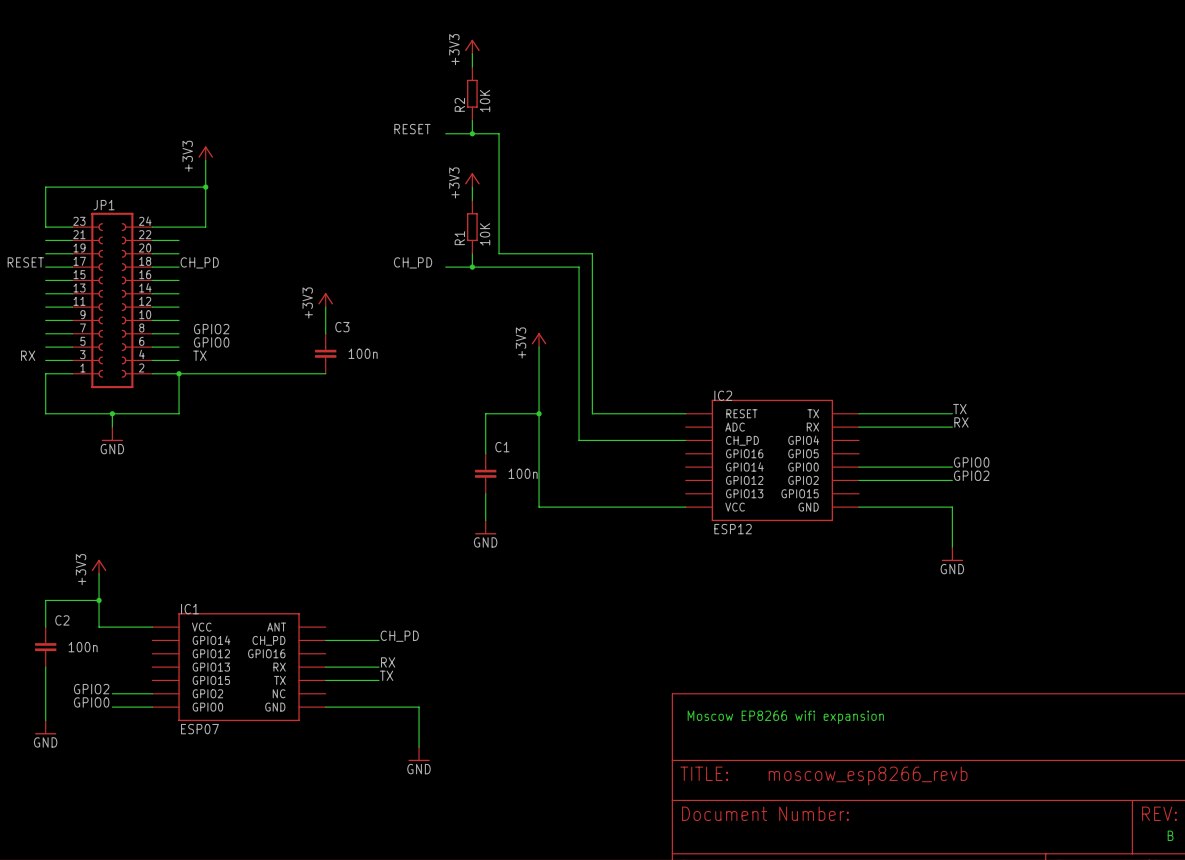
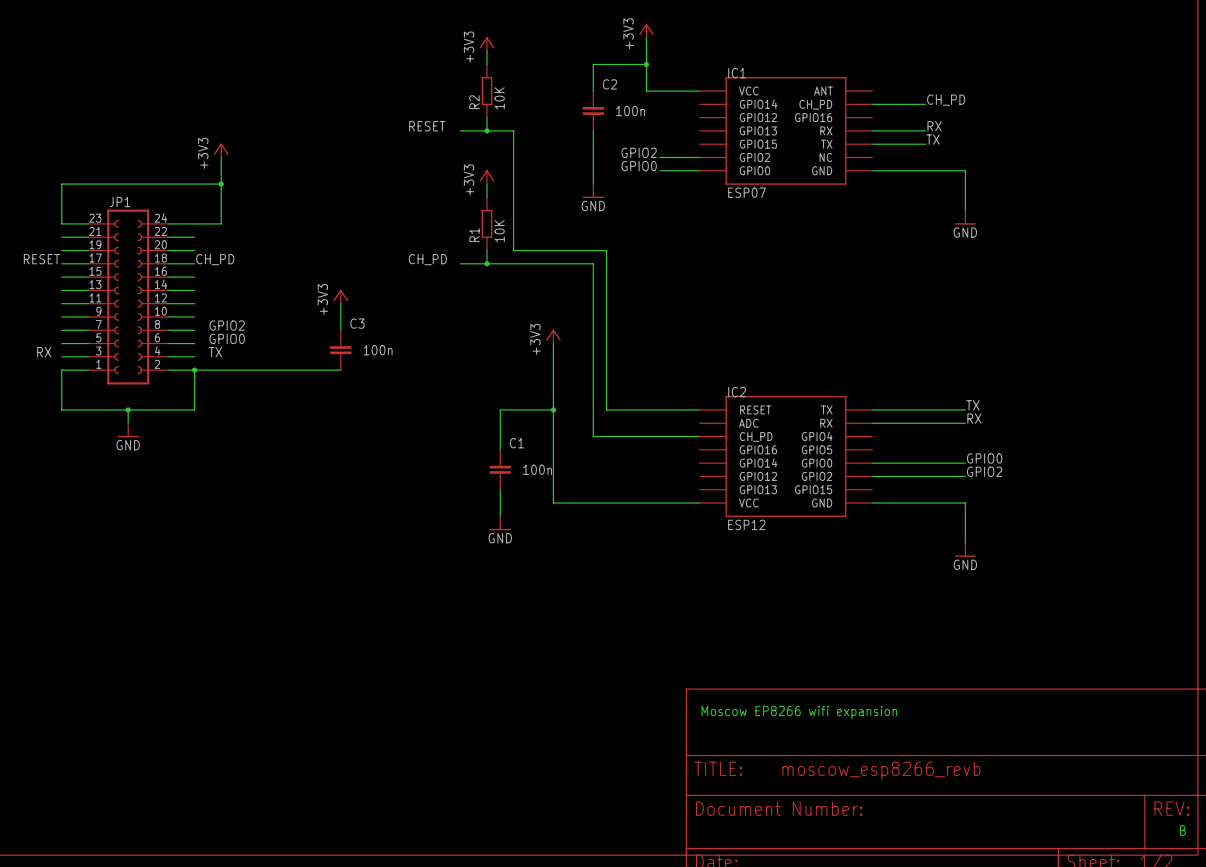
power symbol: none -> +3V3 (646, 30)
wire: none -> (646, 37) (646, 91) (699, 91)
wire: none -> (646, 64) (593, 64) (593, 91)
junction: none -> (646, 64)
label: none -> CH_PD (946, 100)
wire: none -> (872, 104) (925, 104)
label: none -> RX (934, 126)
wire: none -> (593, 130) (593, 184)
wire: none -> (872, 130) (925, 130)
label: none -> TX (932, 139)
wire: none -> (872, 144) (925, 144)
label: none -> GPIO2 (639, 152)
wire: none -> (659, 157) (699, 157)
label: none -> GPIO0 (639, 166)
wire: none -> (659, 170) (699, 170)
wire: none -> (872, 170) (965, 170) (965, 210)
power symbol: none -> GND (593, 191)
power symbol: none -> GND (965, 217)
power symbol: +3V3 (99, 566) -> none
wire: (99, 573) (99, 627) (152, 627) -> none
wire: (99, 600) (45, 600) (45, 627) -> none
junction: (99, 600) -> none
label: CH_PD (399, 636) -> none
wire: (325, 640) (379, 640) -> none
C2 position: (45, 647) -> (593, 110)
label: RX (388, 662) -> none
wire: (45, 667) (45, 720) -> none
IC1 position: (239, 667) -> (785, 130)
wire: (325, 667) (379, 667) -> none
label: TX (386, 675) -> none
wire: (325, 680) (379, 680) -> none
label: GPIO2 (91, 689) -> none
wire: (112, 693) (152, 693) -> none
label: GPIO0 (91, 702) -> none
wire: (112, 707) (152, 707) -> none
wire: (325, 707) (419, 707) (419, 747) -> none
power symbol: GND (45, 727) -> none
power symbol: GND (419, 754) -> none

